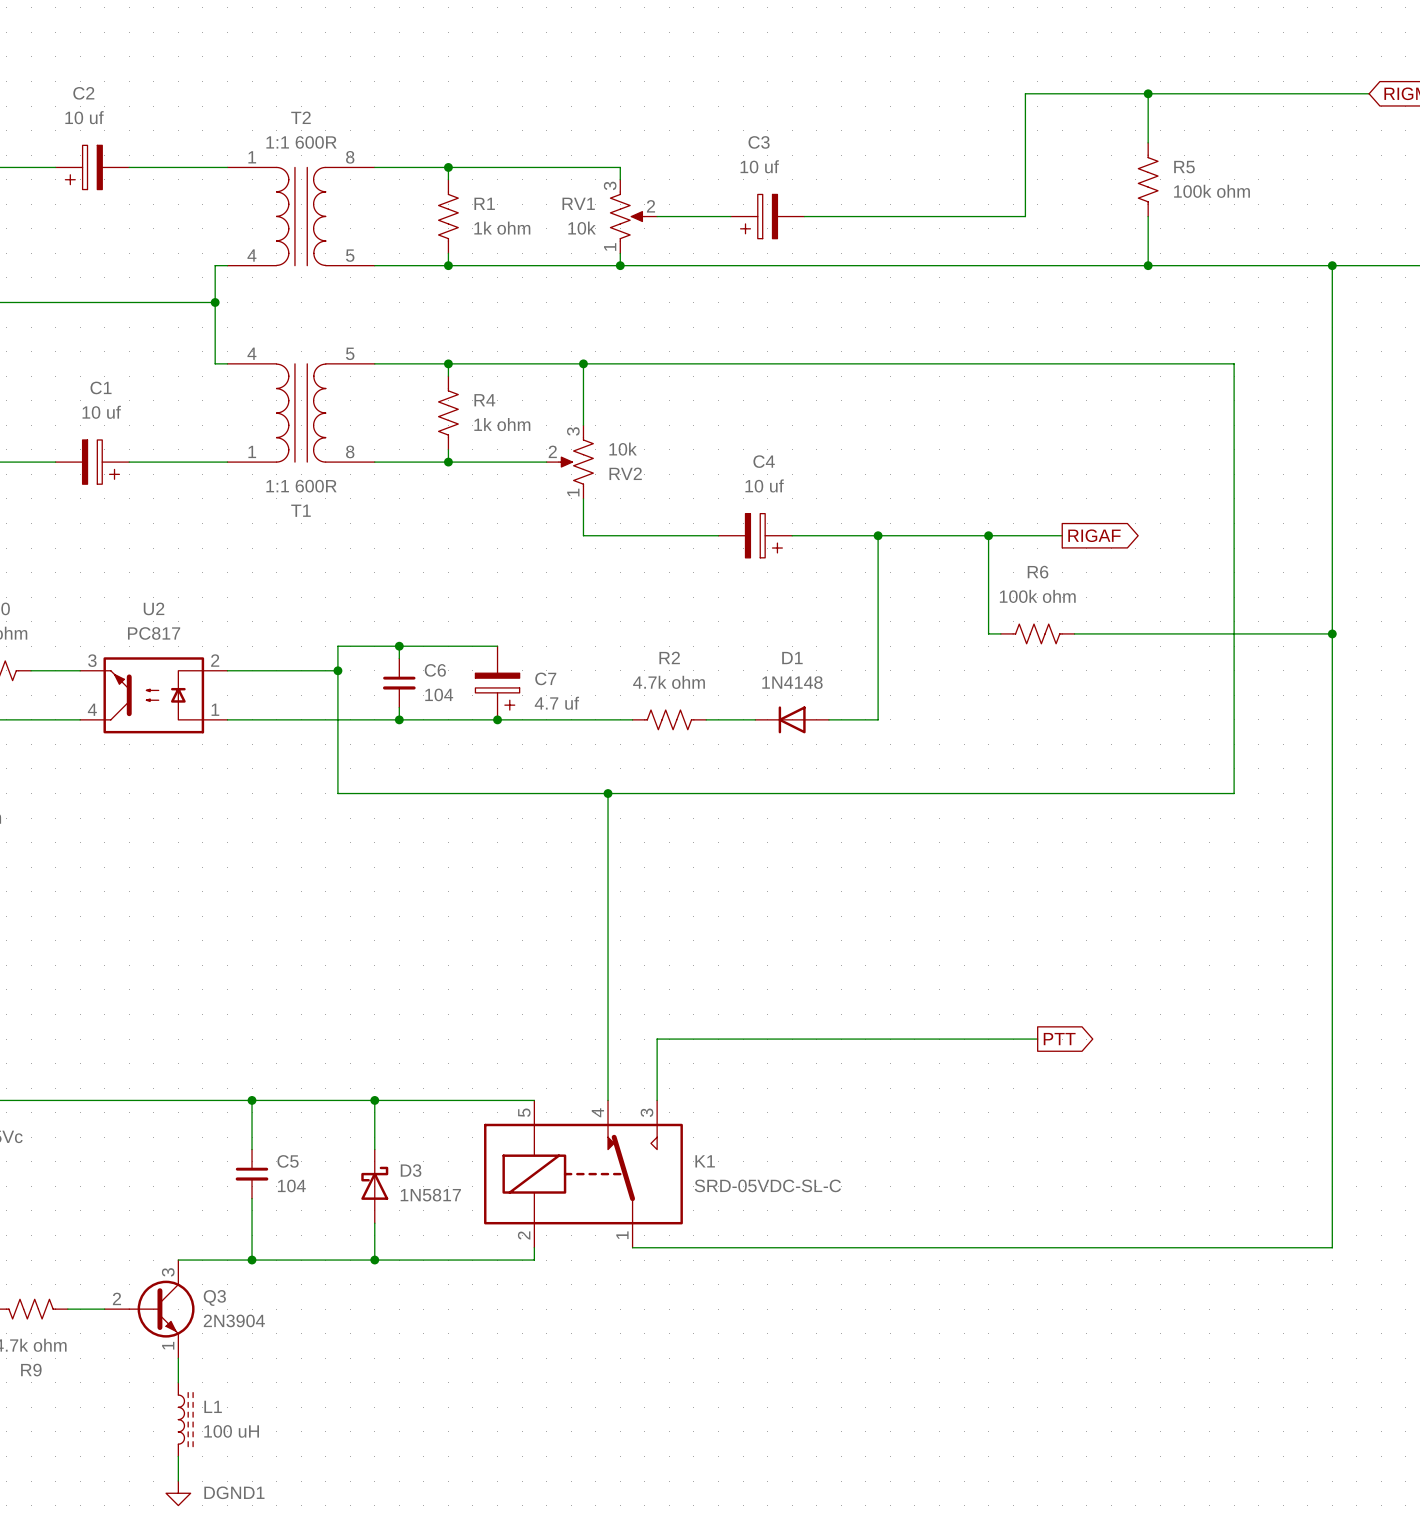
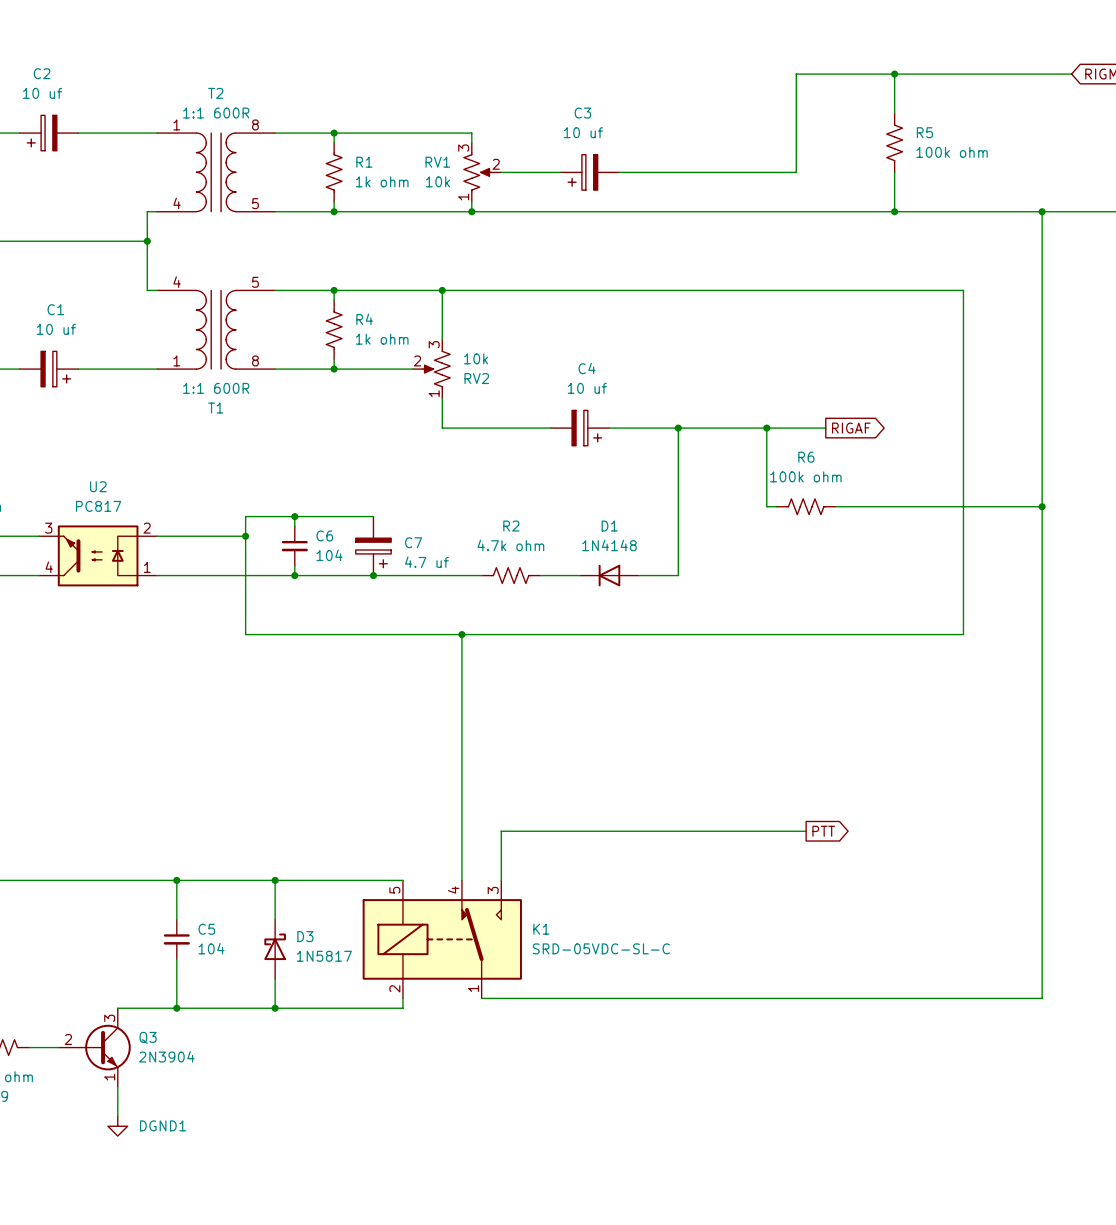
L1: 100 uH (185, 1419) -> none
wire: (178, 1456) (178, 1481) -> none
power symbol position: DGND1 (178, 1493) -> DGND1 (117, 1126)

